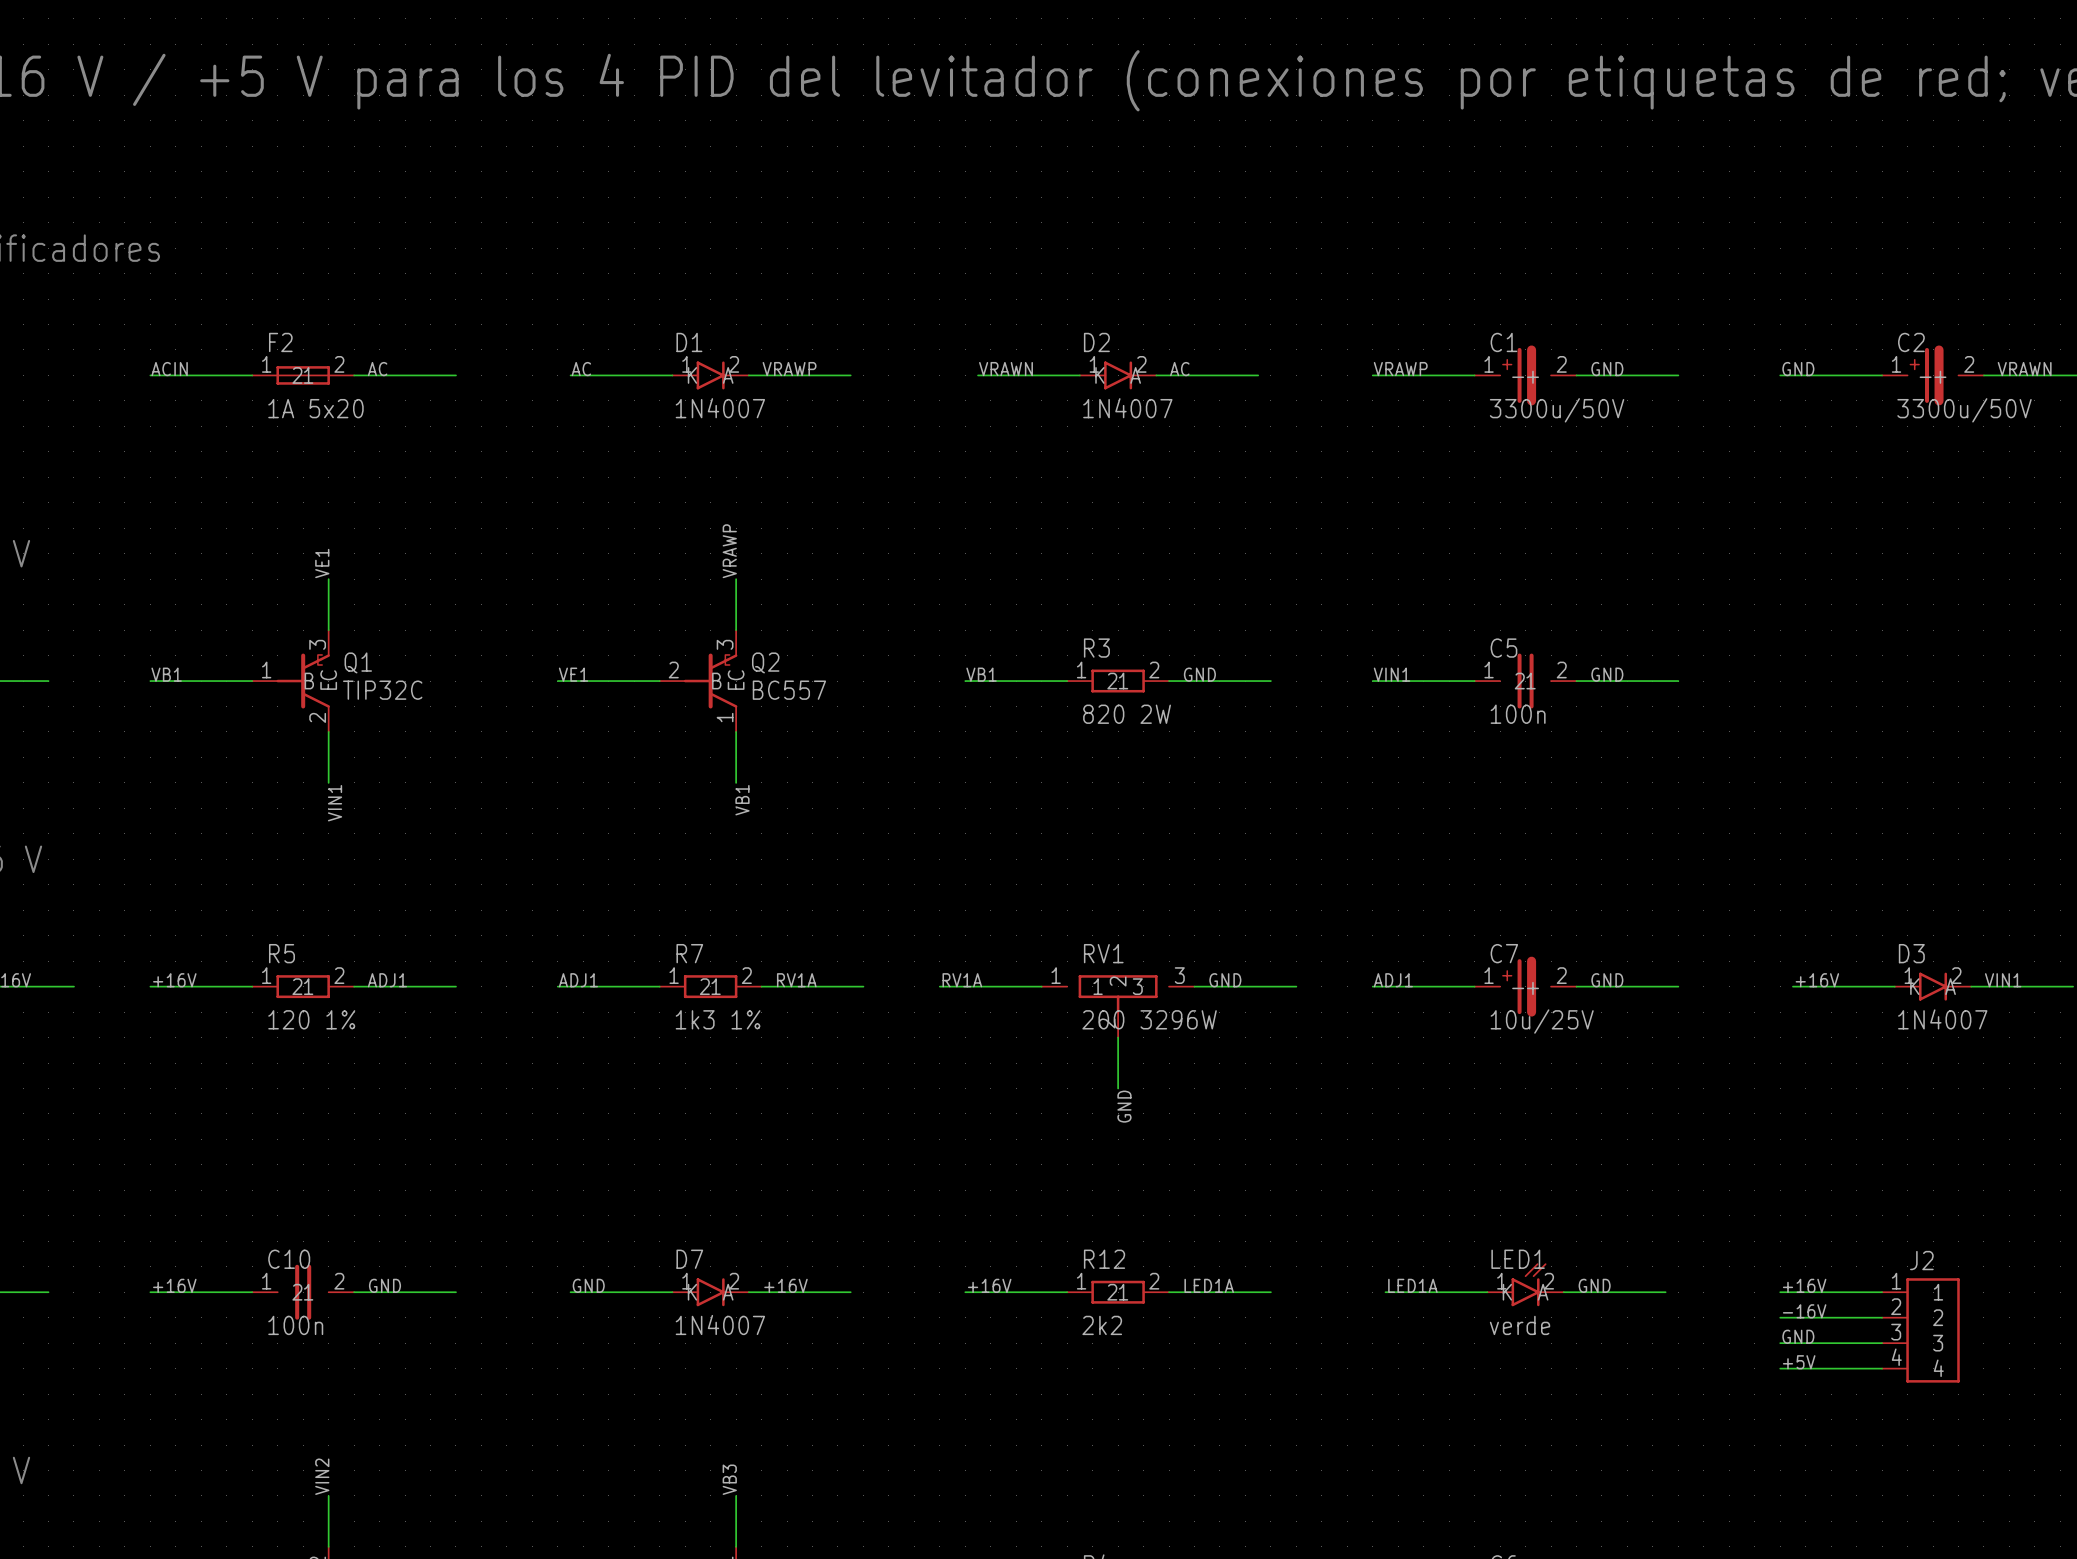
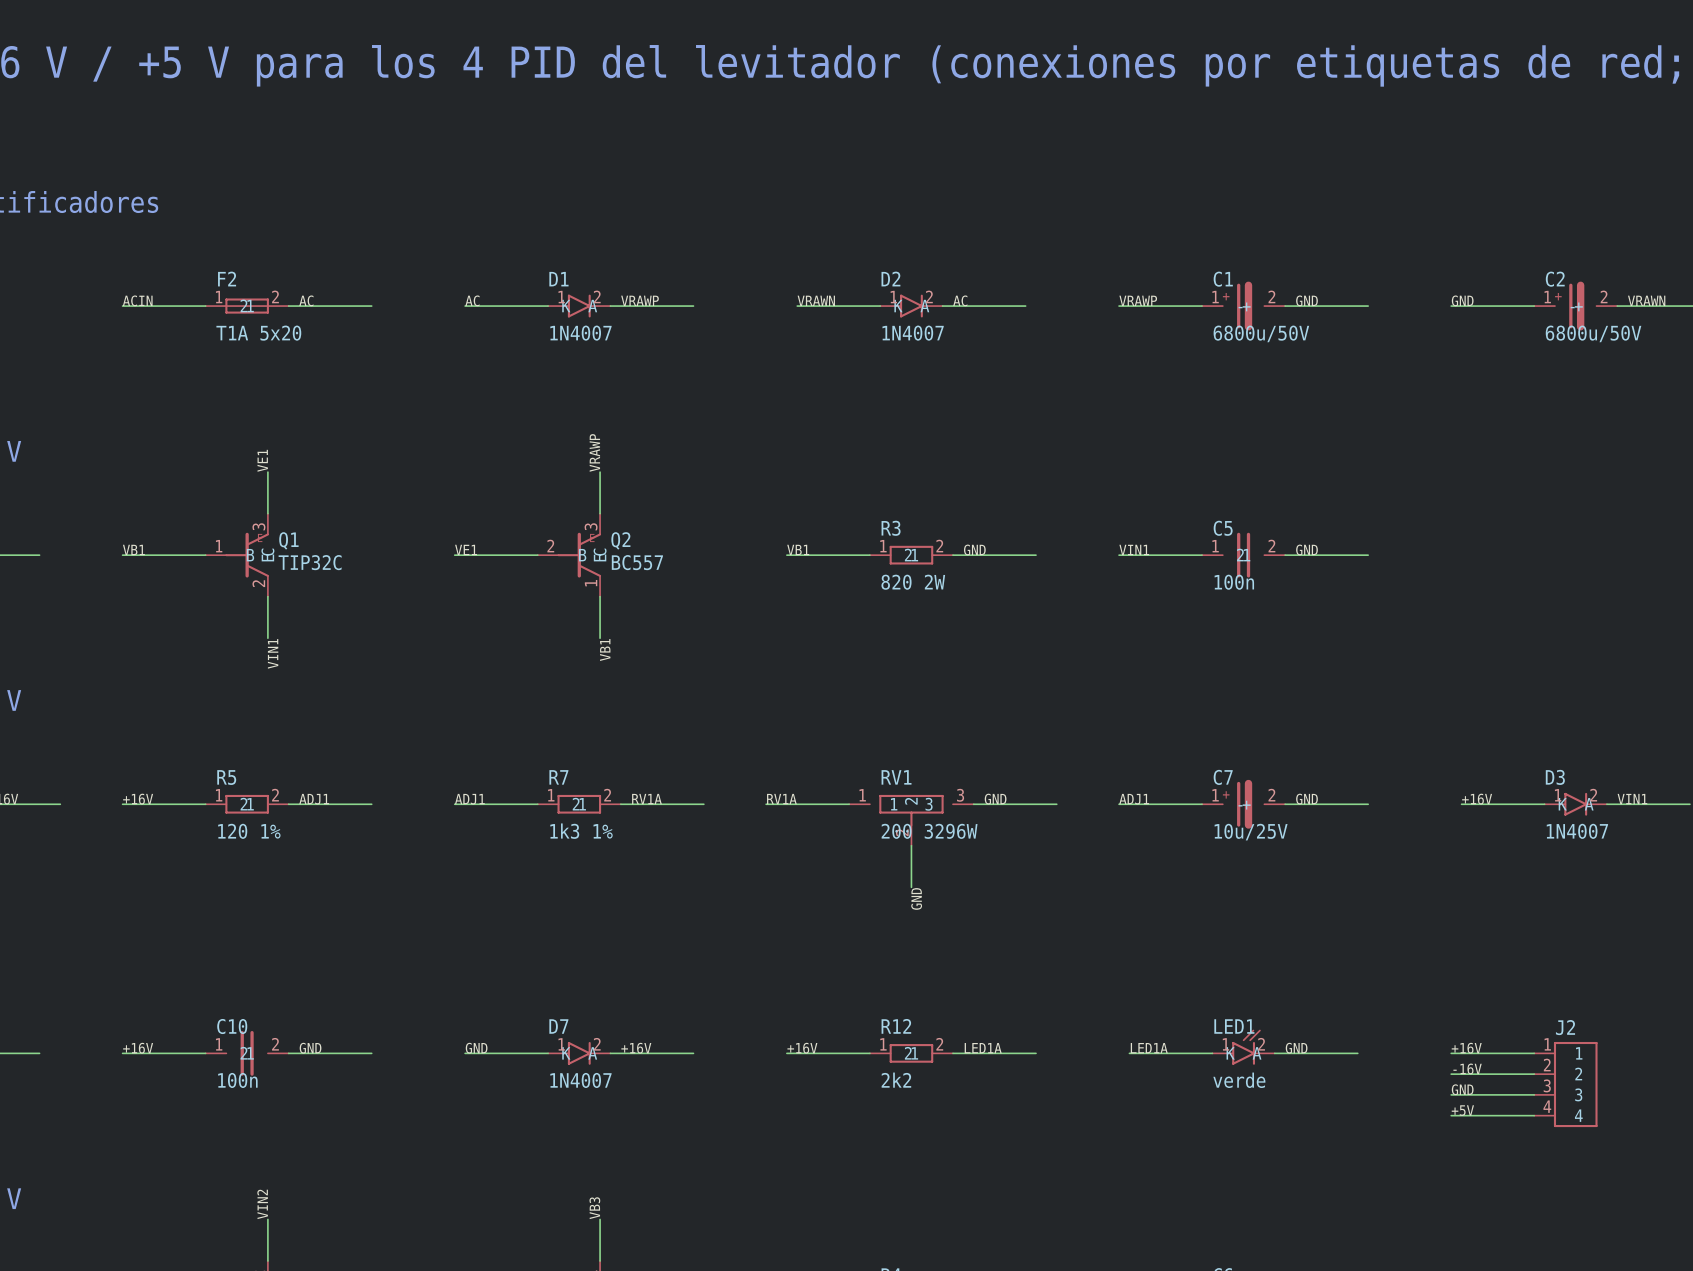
F2 value: 1A 5x20 (315, 408) -> T1A 5x20 (258, 333)
C1 value: 3300u/50V (1557, 410) -> 6800u/50V (1261, 333)
C2 value: 3300u/50V (1964, 410) -> 6800u/50V (1593, 333)

